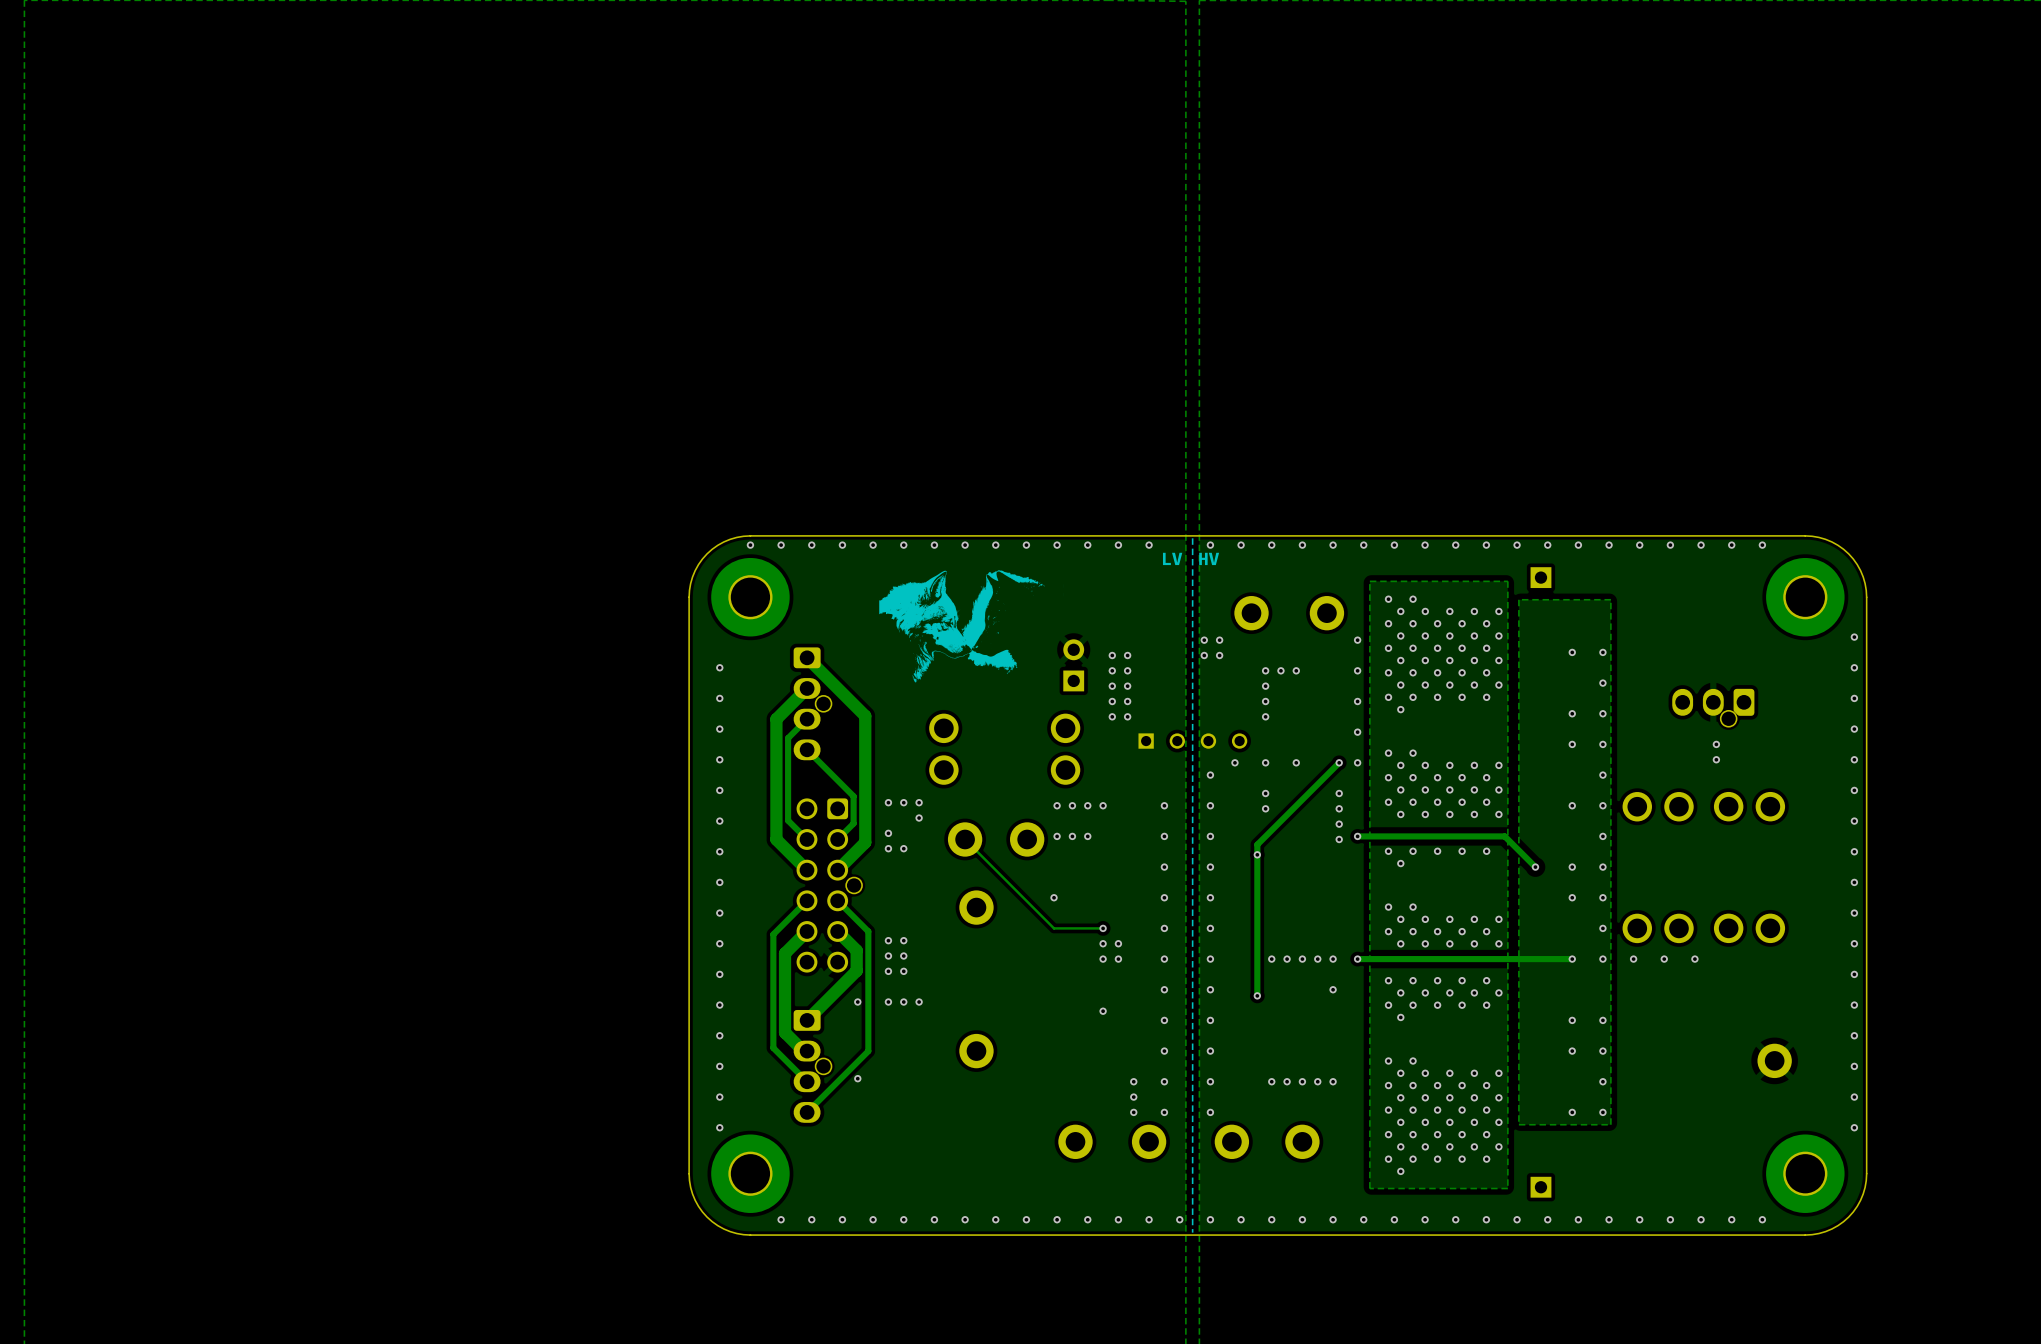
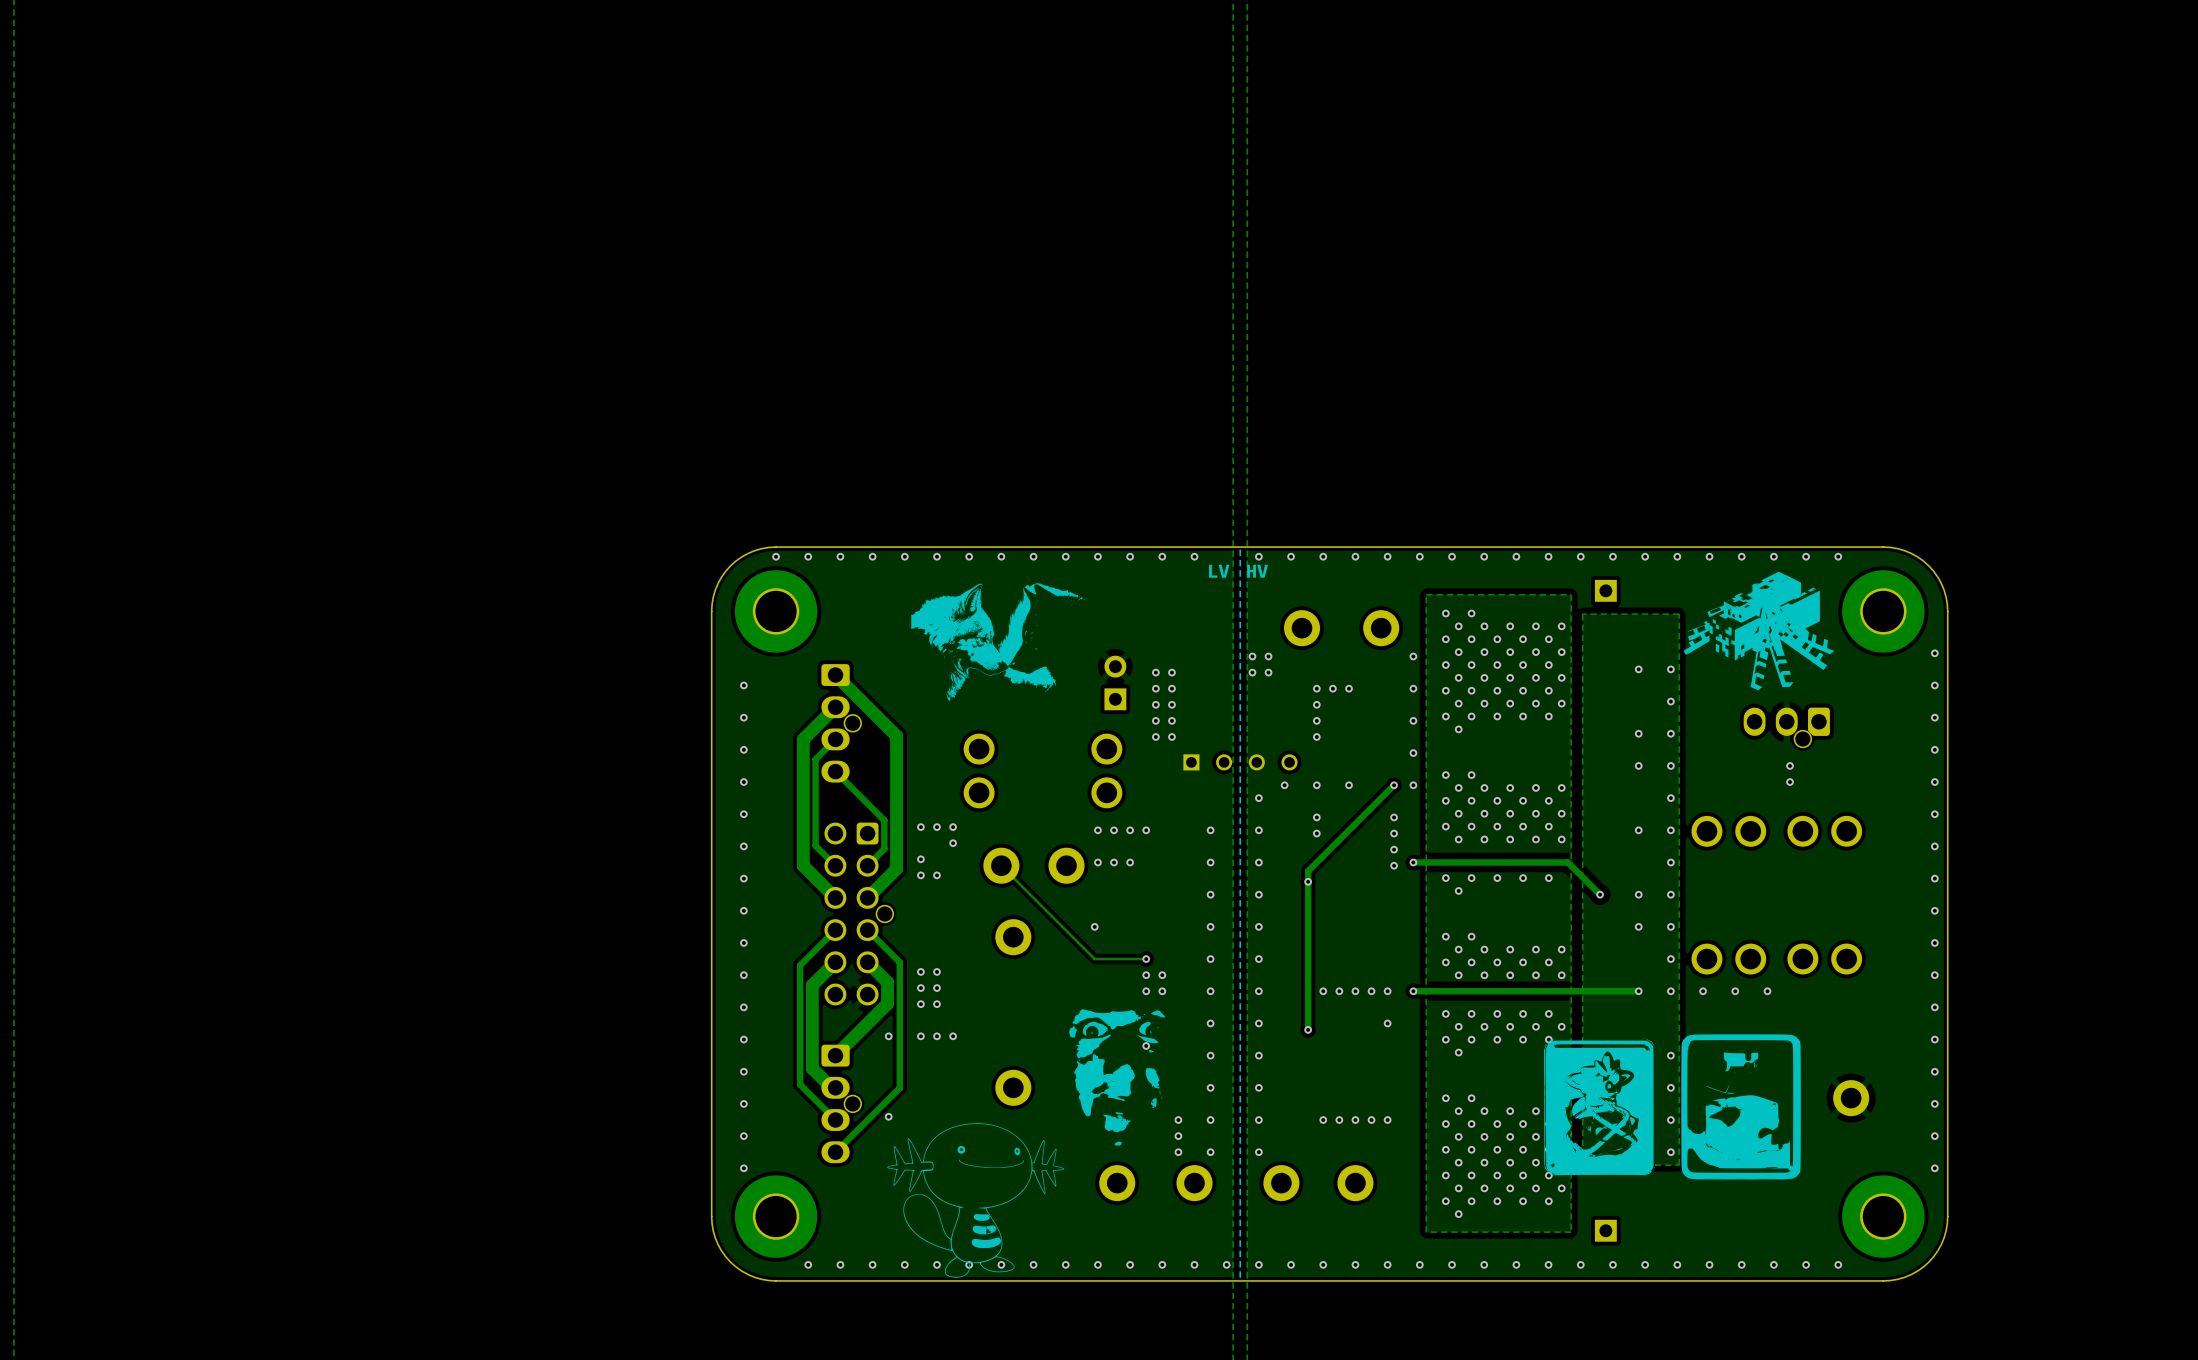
drawing: none -> [1682, 571, 1835, 691]
drawing: none -> [887, 1009, 1211, 1278]
drawing: none -> [1681, 1034, 1801, 1180]
drawing: none -> [1543, 1038, 1656, 1176]

